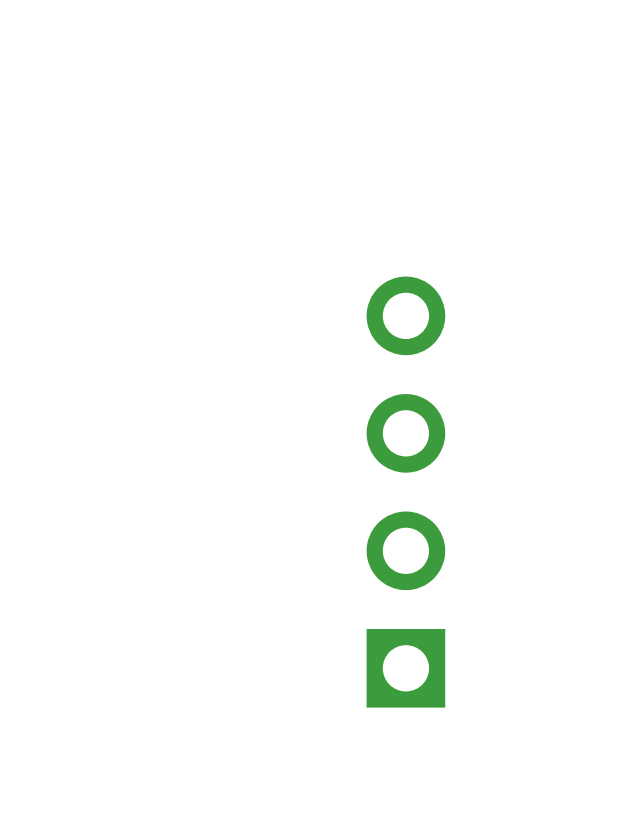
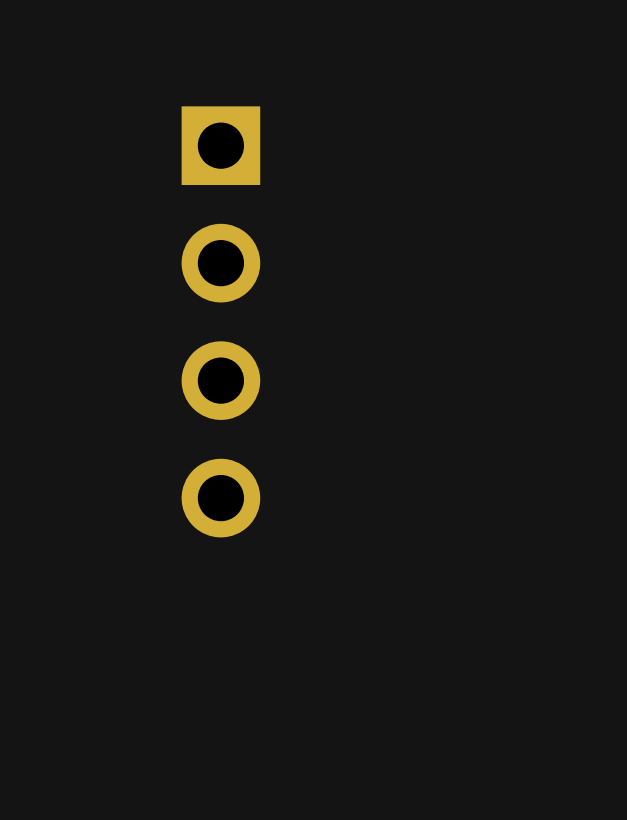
part rotation: 0° (405, 492) -> 180° (220, 321)

